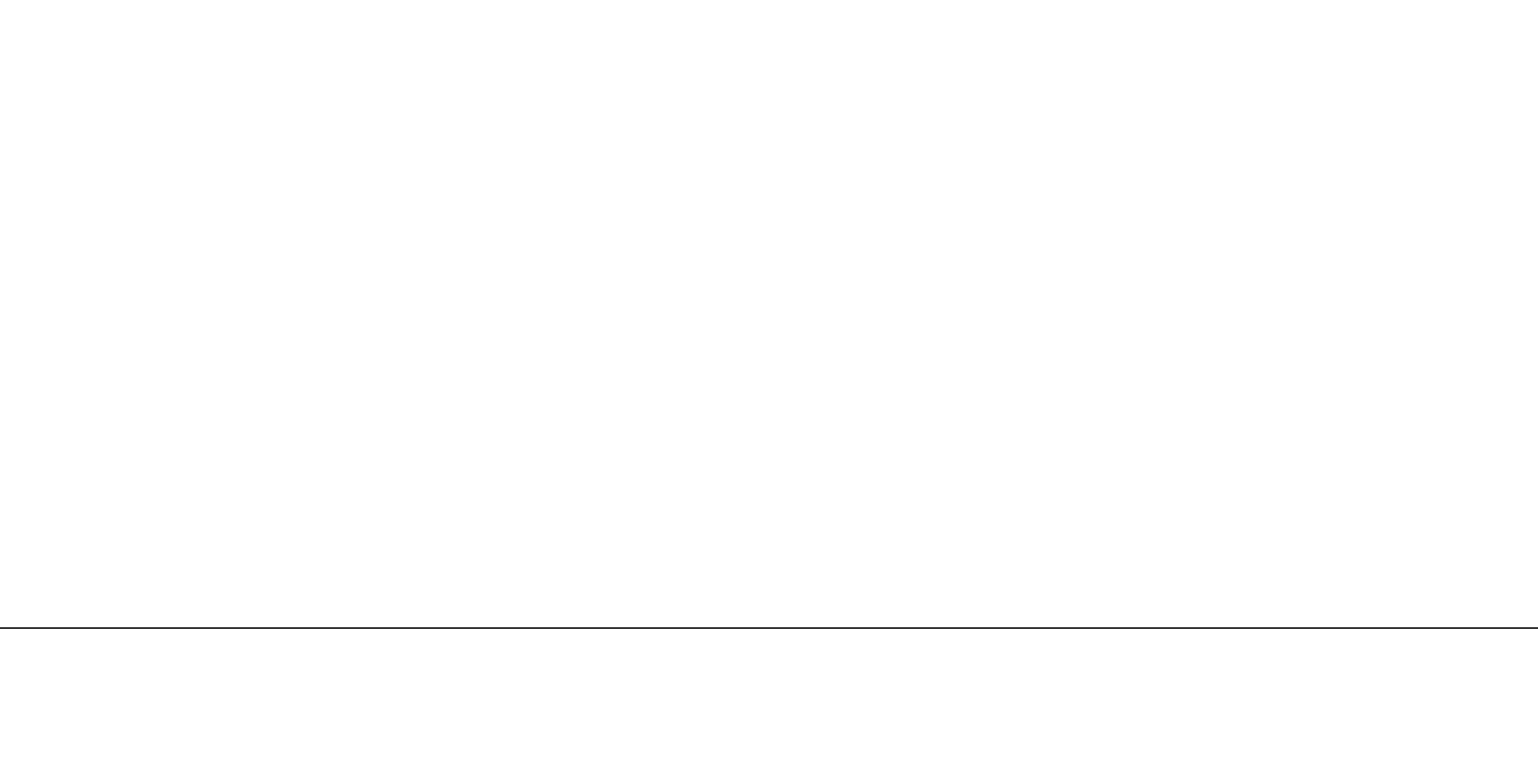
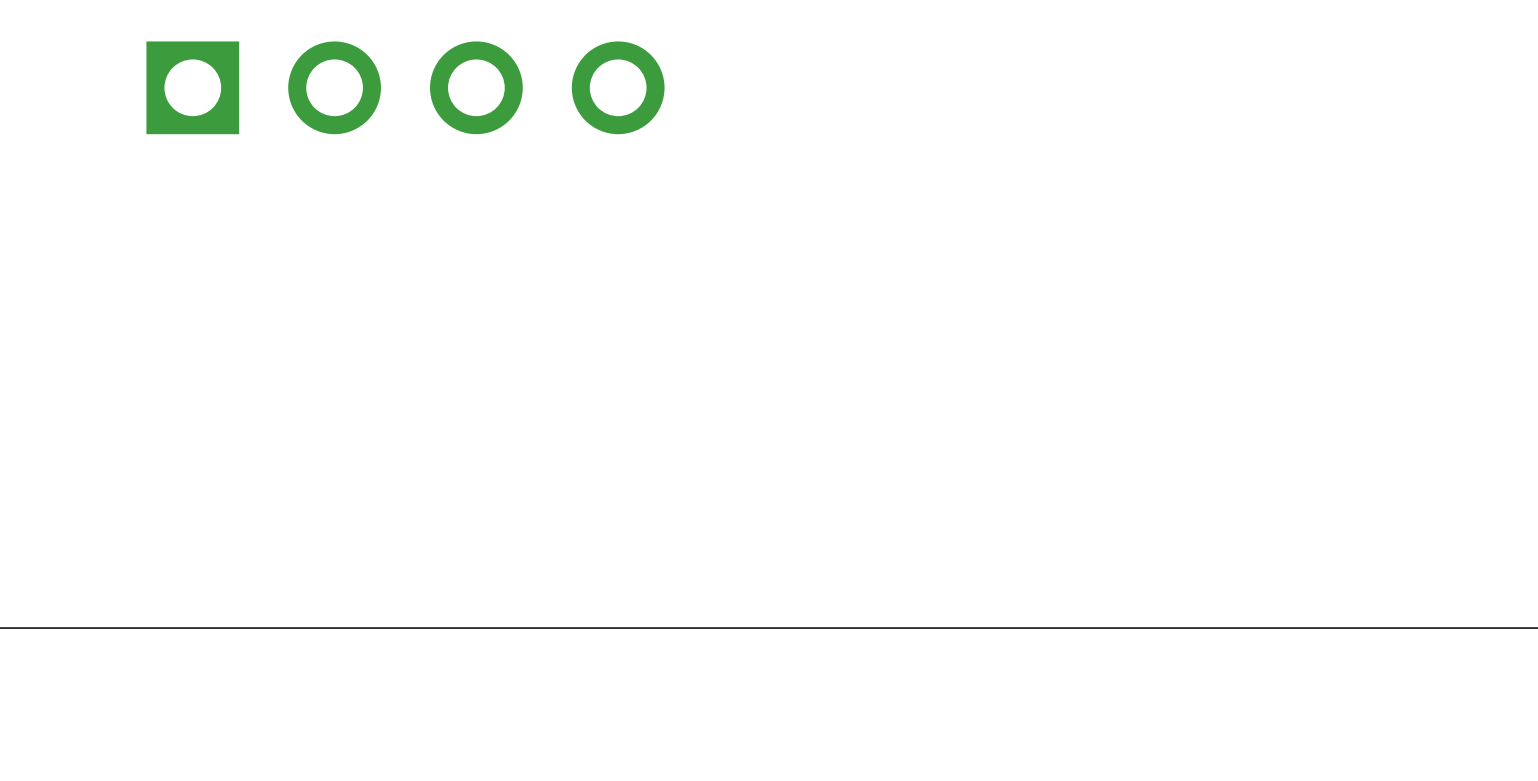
part: none -> (405, 87)

